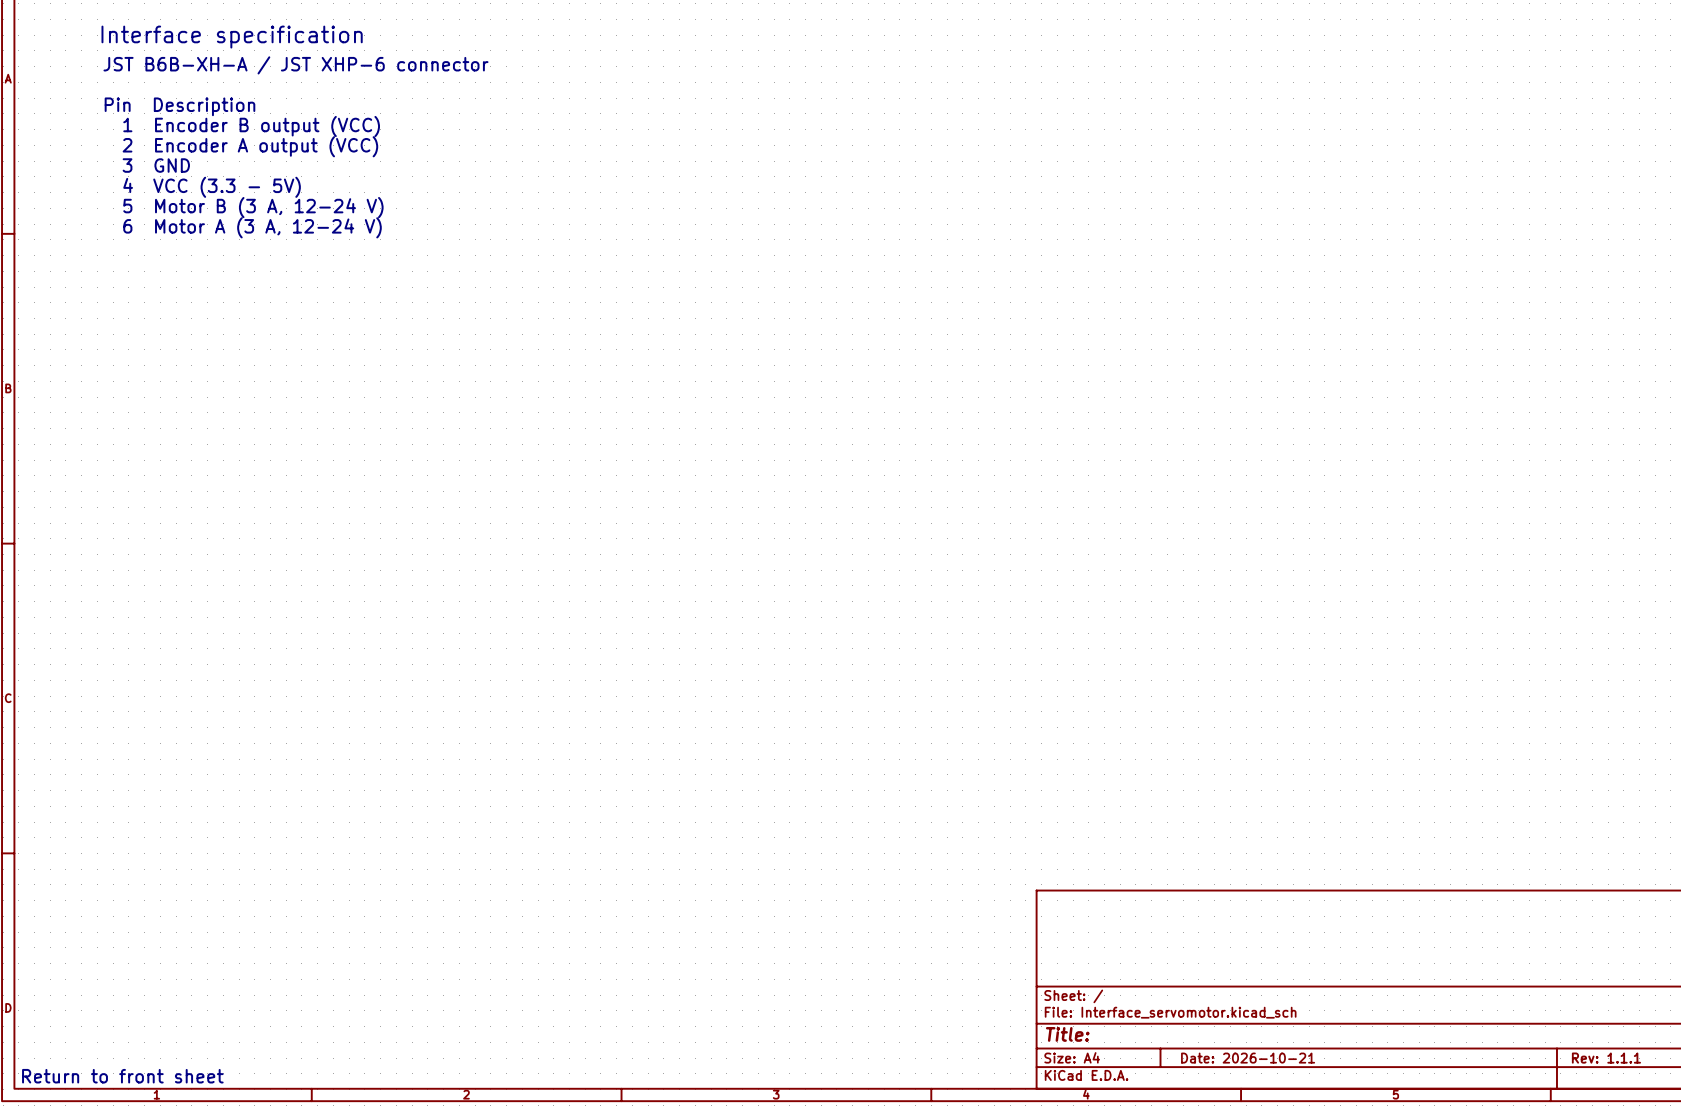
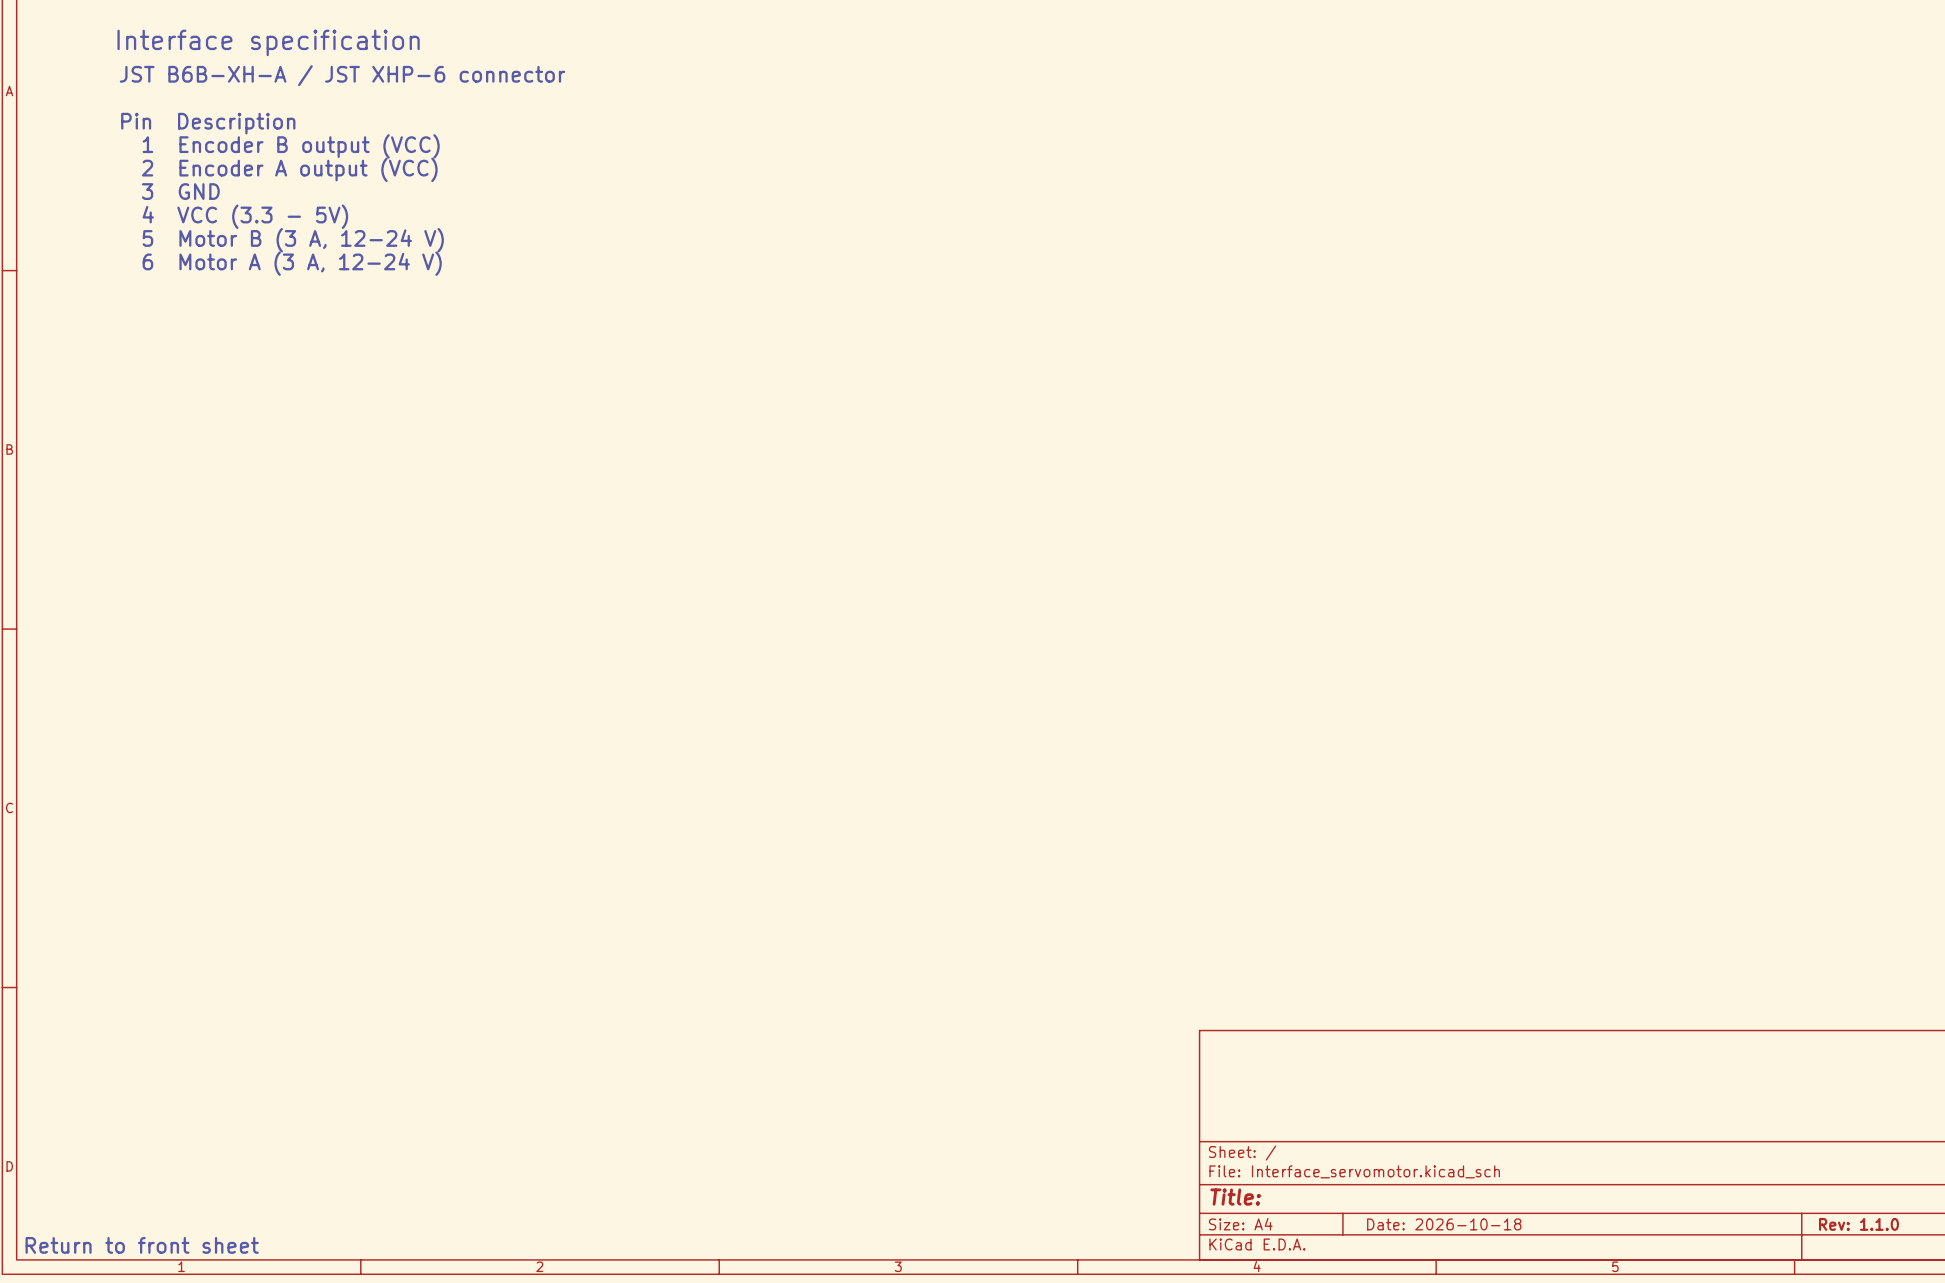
title block: Date: 2026-10-21 (1248, 1058) -> Date: 2026-10-18 (1444, 1224)
title block: Rev: 1.1.1 (1606, 1058) -> Rev: 1.1.0 (1858, 1224)

